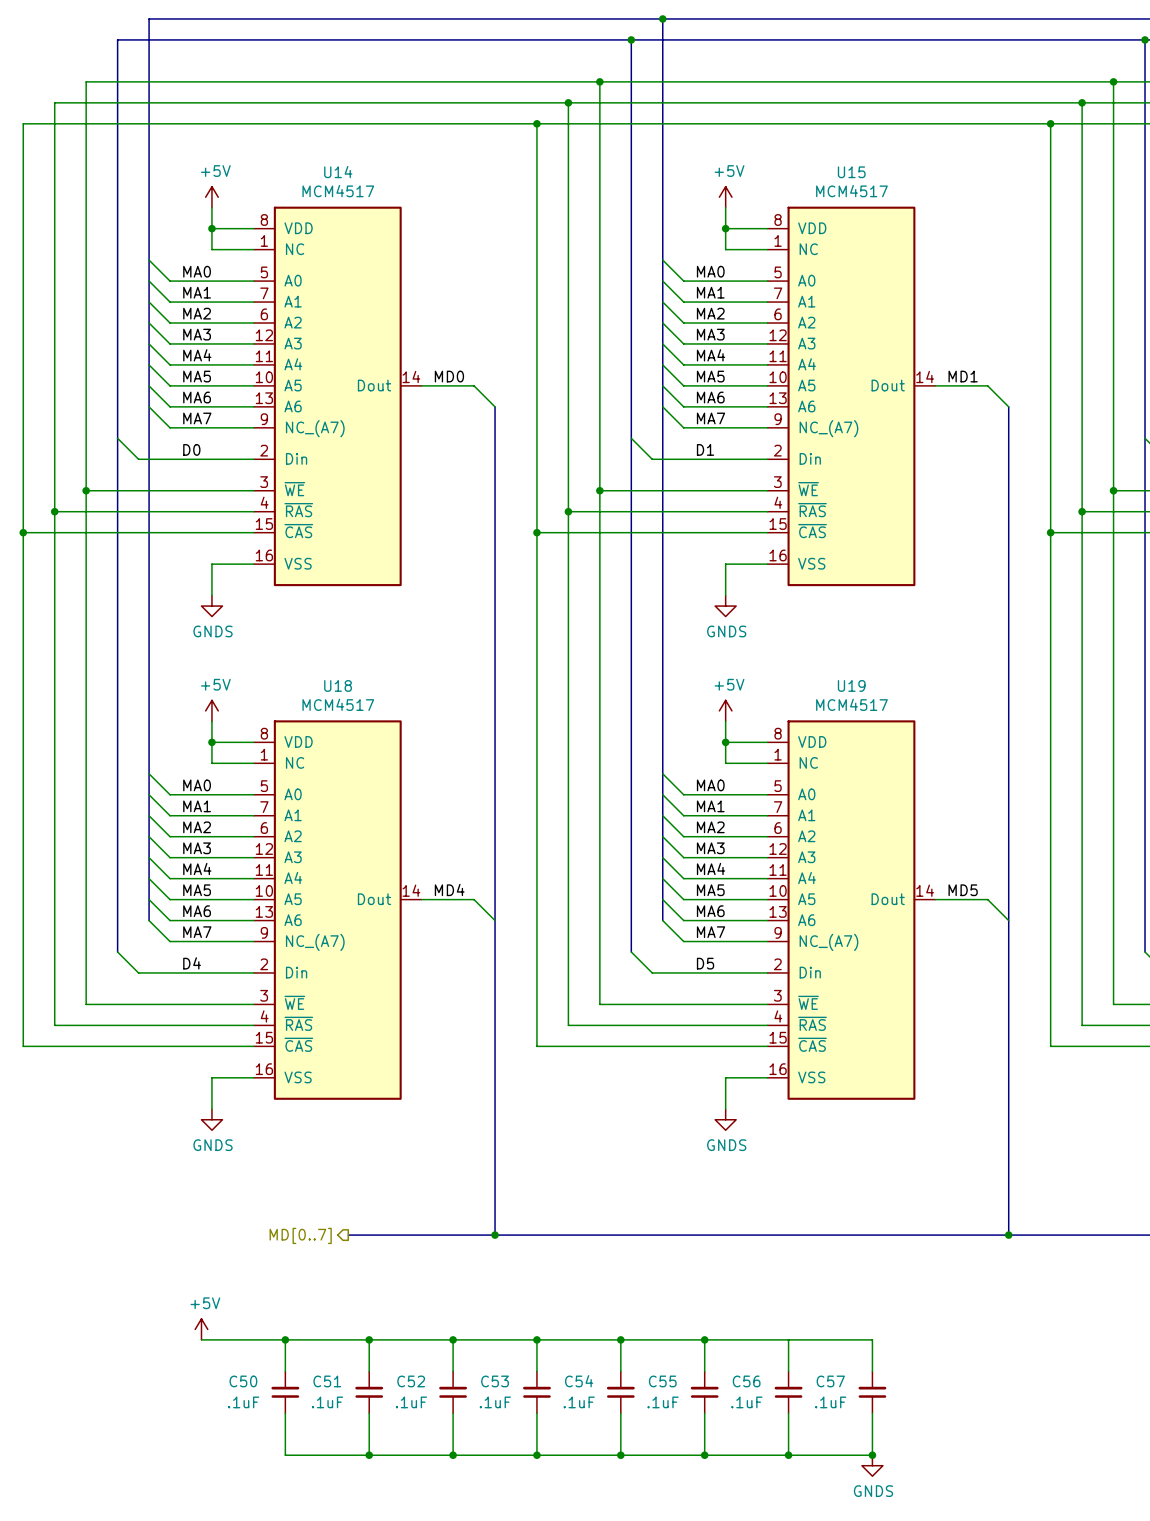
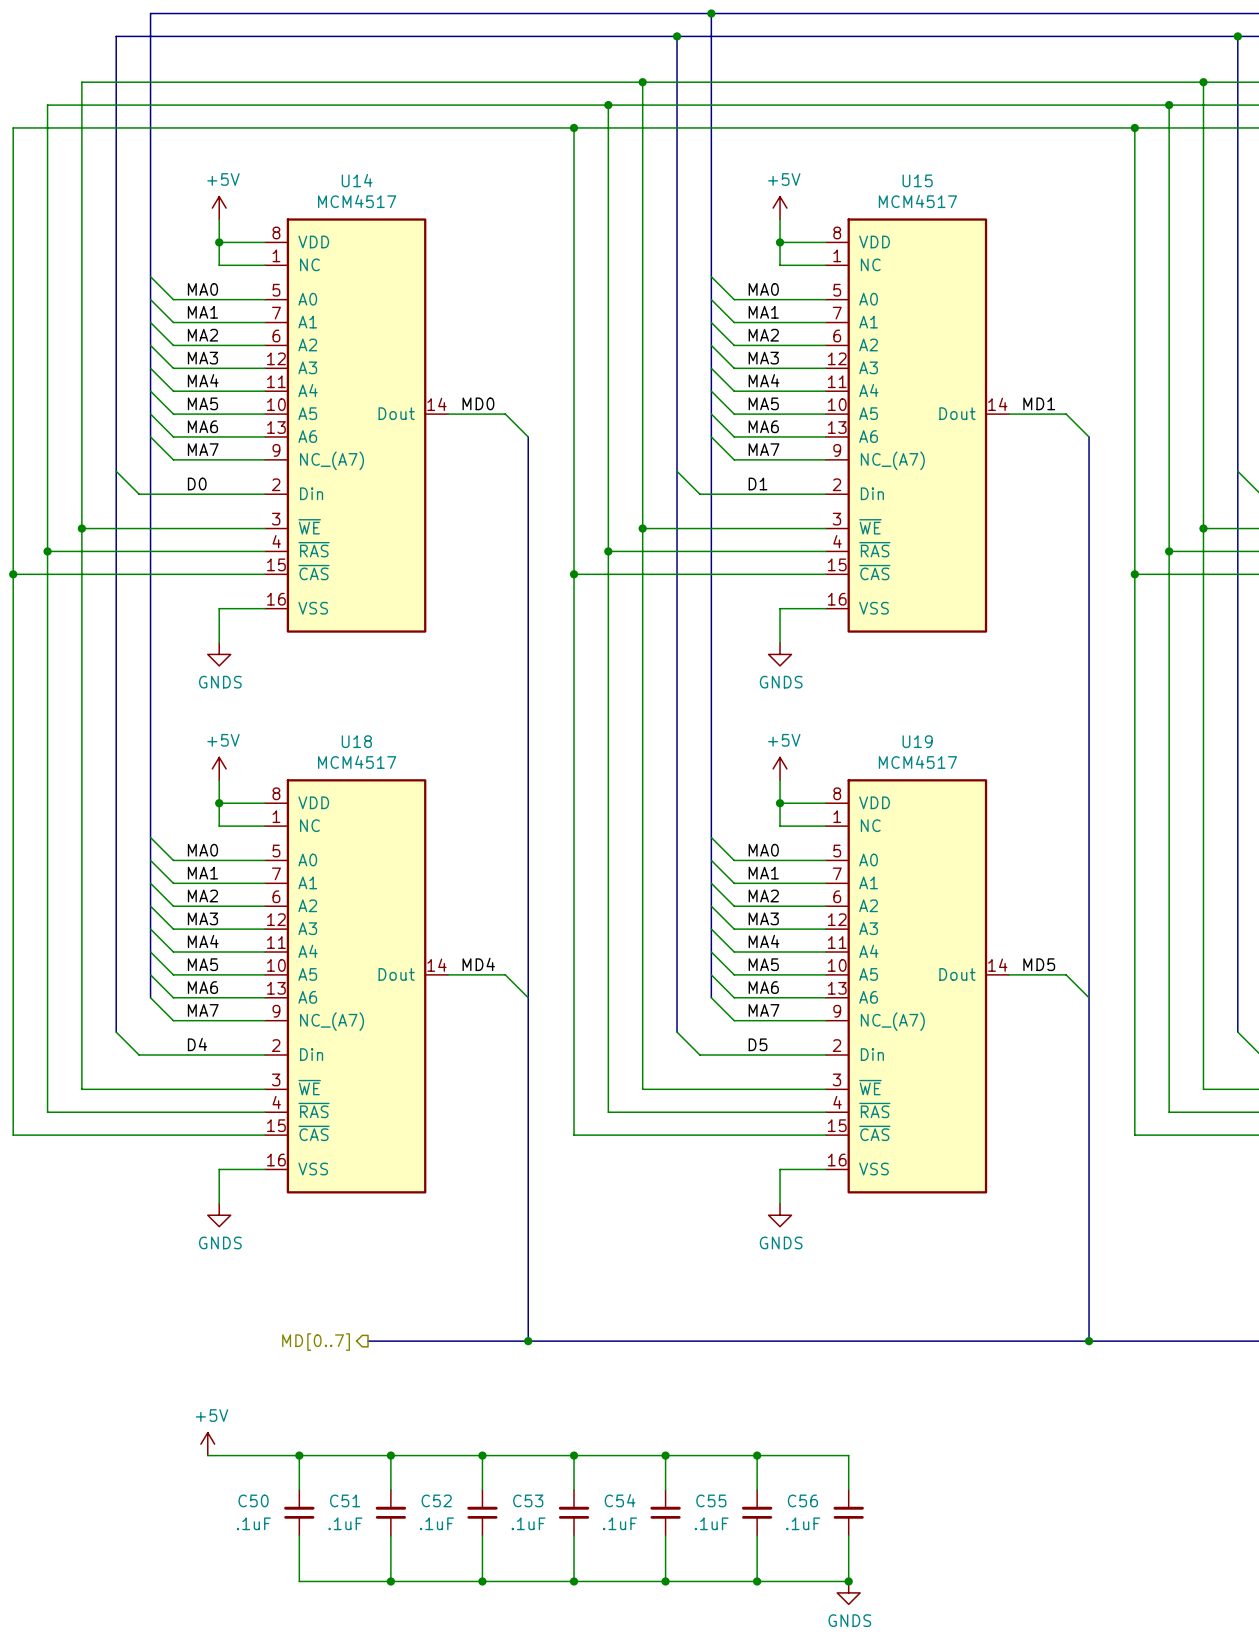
wire: (788, 1339) (872, 1339) (872, 1371) -> none
C57: .1uF (872, 1392) -> none
wire: (872, 1413) (872, 1455) (788, 1455) -> none
junction: (872, 1455) -> none
power symbol position: GNDS (872, 1465) -> GNDS (848, 1592)

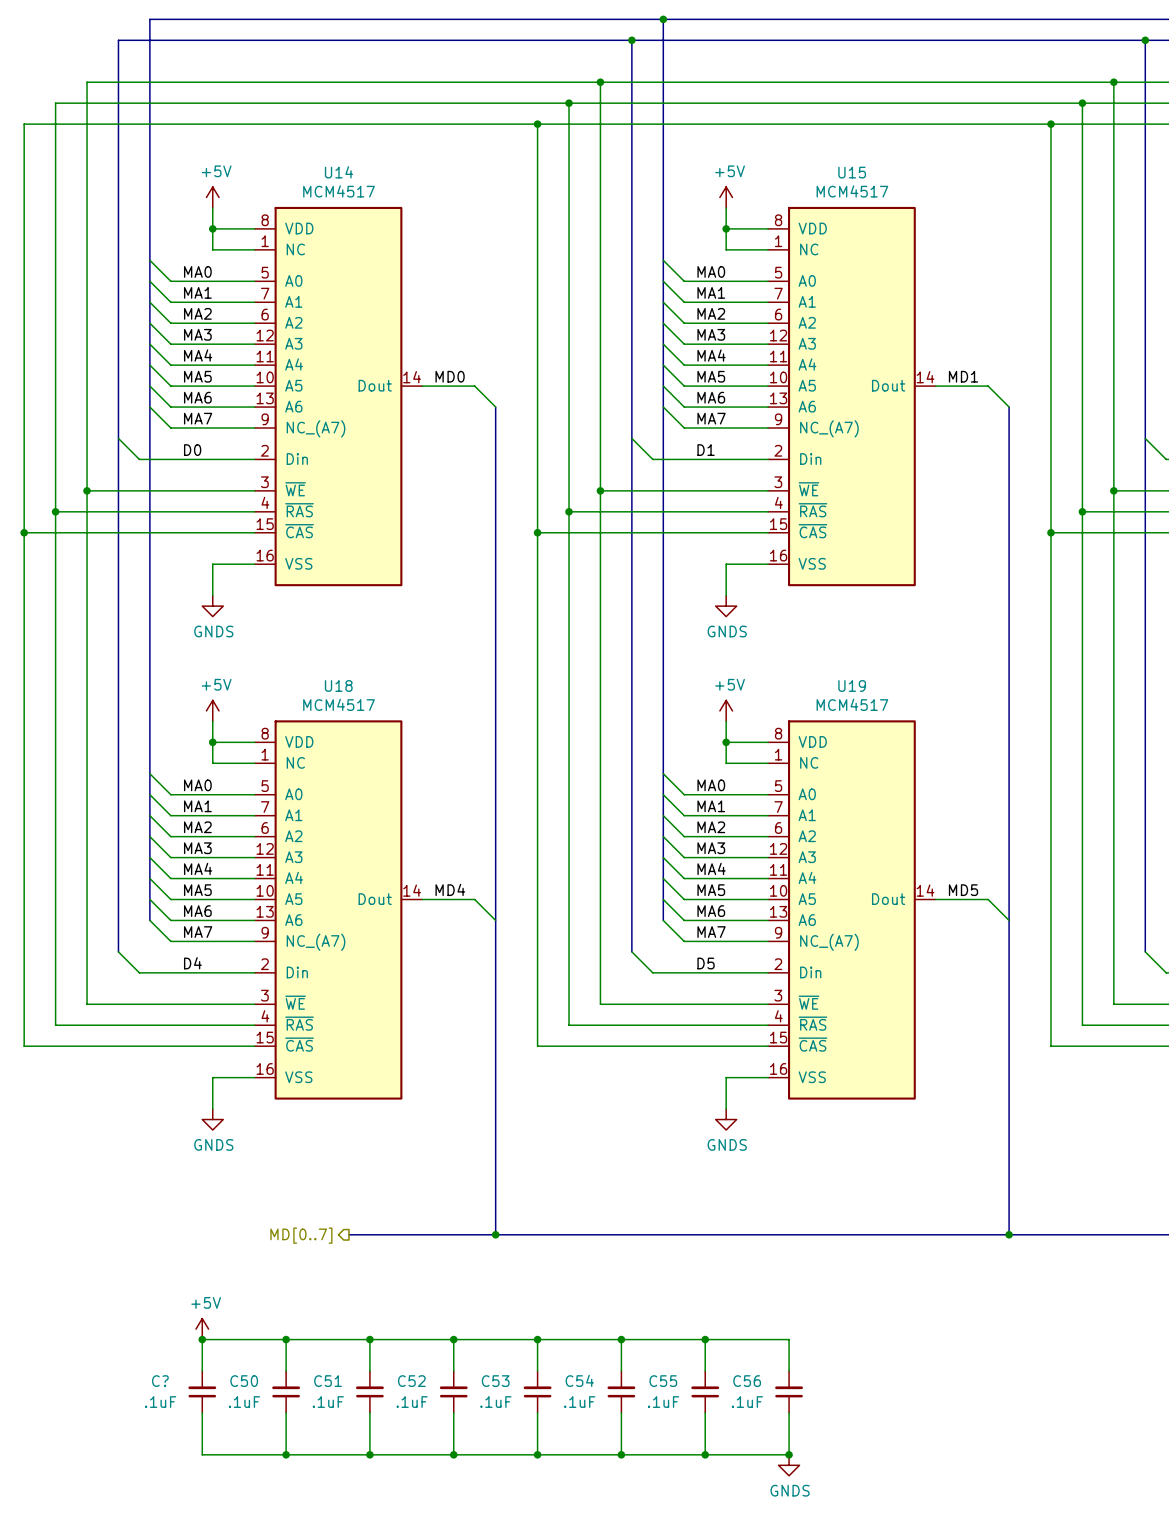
wire: none -> (202, 1339) (202, 1371)
junction: none -> (202, 1339)
C?: none -> .1uF (202, 1391)
wire: none -> (202, 1412) (202, 1454) (286, 1454)
junction: none -> (286, 1454)

